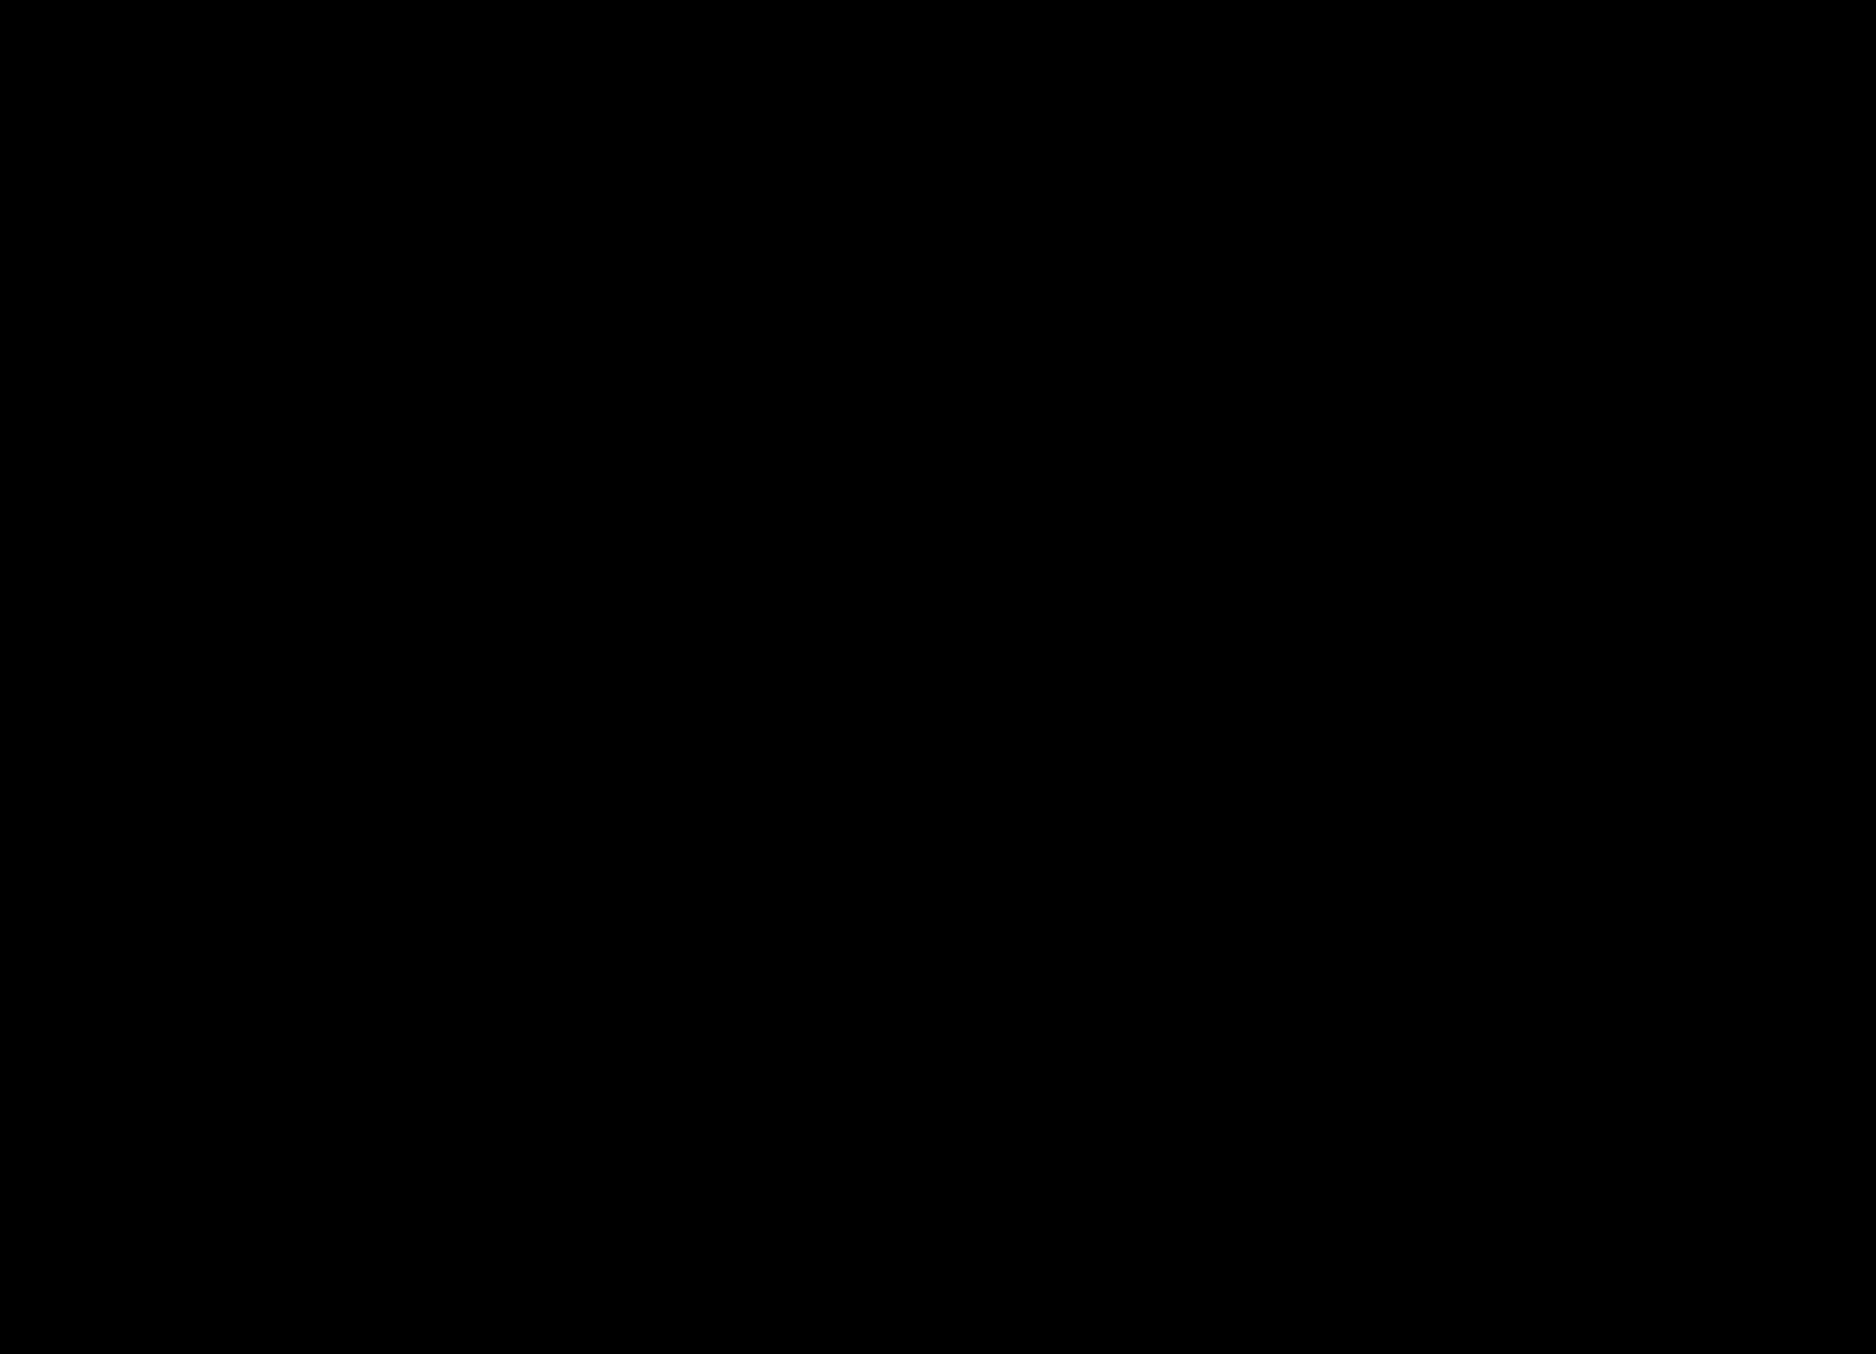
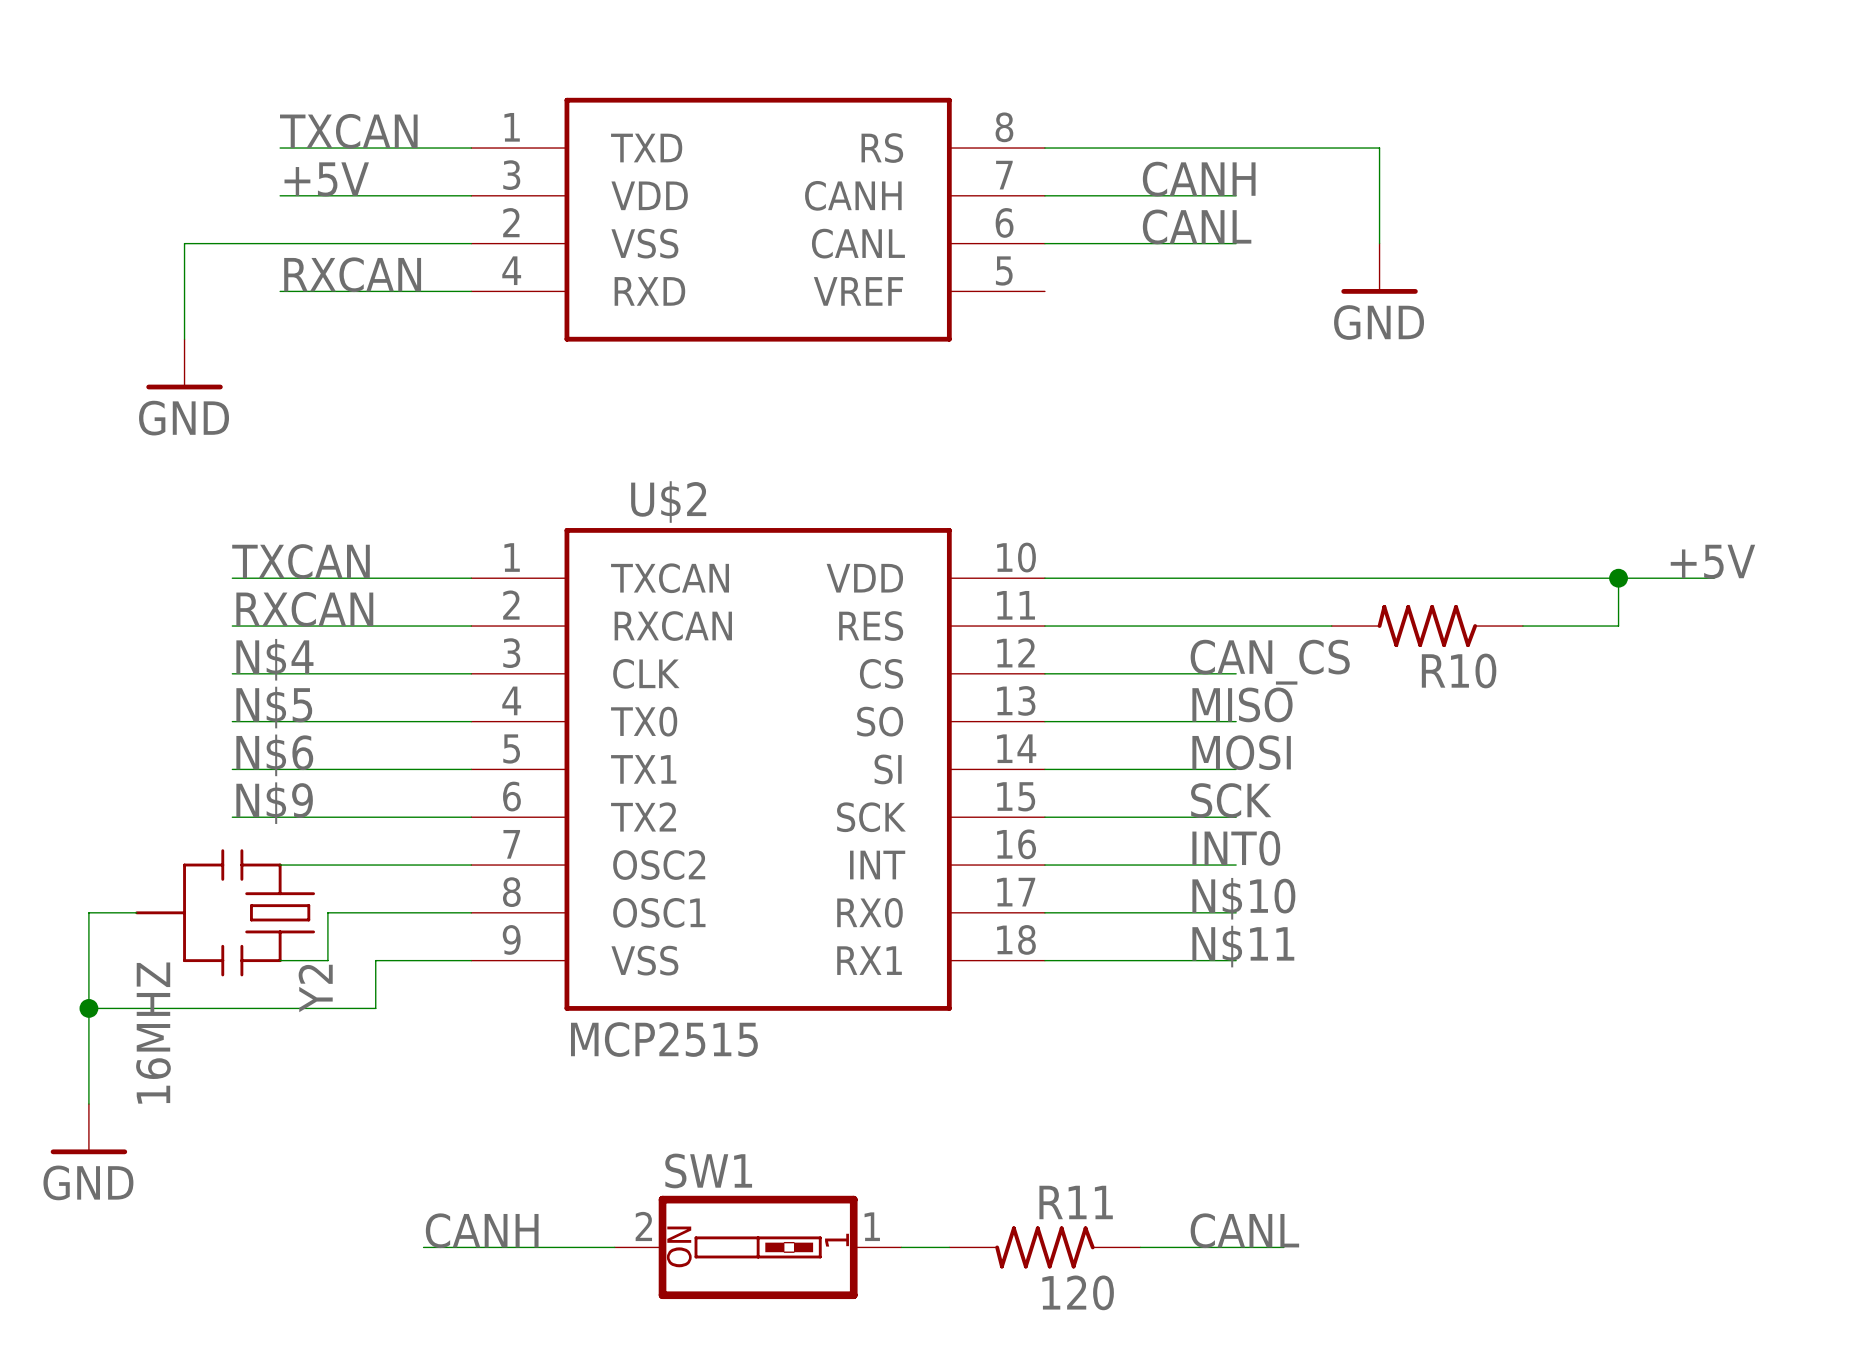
label: none -> TXCAN (348, 131)
wire: none -> (280, 148) (471, 148)
wire: none -> (1044, 148) (1379, 148) (1379, 243)
label: none -> +5V (326, 179)
label: none -> CANH (1199, 179)
wire: none -> (280, 195) (471, 195)
wire: none -> (1044, 195) (1236, 195)
part: none -> (758, 219)
label: none -> CANL (1197, 226)
wire: none -> (471, 243) (184, 243) (184, 339)
wire: none -> (1044, 243) (1236, 243)
power symbol: none -> GND (1379, 268)
label: none -> RXCAN (352, 274)
wire: none -> (280, 291) (471, 291)
power symbol: none -> GND (184, 364)
label: none -> TXCAN (301, 561)
label: none -> +5V (1712, 561)
wire: none -> (232, 578) (471, 578)
wire: none -> (1044, 578) (1714, 578)
wire: none -> (1618, 578) (1618, 626) (1522, 626)
junction: none -> (1618, 578)
label: none -> RXCAN (304, 609)
wire: none -> (232, 626) (471, 626)
wire: none -> (1044, 626) (1331, 626)
R10: none -> (1427, 626)
label: none -> N$4 (274, 659)
label: none -> CAN_CS (1270, 662)
wire: none -> (232, 673) (471, 673)
wire: none -> (1044, 673) (1236, 673)
label: none -> N$5 (274, 707)
label: none -> MISO (1242, 704)
wire: none -> (232, 721) (471, 721)
wire: none -> (1044, 721) (1236, 721)
label: none -> N$6 (274, 755)
label: none -> MOSI (1241, 752)
wire: none -> (232, 769) (471, 769)
U$2: none -> MCP2515 (758, 769)
wire: none -> (1044, 769) (1236, 769)
label: none -> N$9 (274, 803)
label: none -> SCK (1231, 800)
wire: none -> (232, 817) (471, 817)
wire: none -> (1044, 817) (1236, 817)
label: none -> INT0 (1236, 848)
wire: none -> (280, 865) (471, 865)
wire: none -> (1044, 865) (1236, 865)
label: none -> N$10 (1243, 898)
wire: none -> (136, 912) (88, 912) (88, 1104)
Y2: none -> 16MHZ (225, 912)
wire: none -> (471, 912) (327, 912) (327, 960) (280, 960)
wire: none -> (1044, 912) (1236, 912)
label: none -> N$11 (1243, 946)
wire: none -> (471, 960) (375, 960) (375, 1008) (88, 1008)
wire: none -> (1044, 960) (1236, 960)
junction: none -> (88, 1008)
power symbol: none -> GND (88, 1129)
label: none -> CANH (482, 1230)
label: none -> CANL (1244, 1230)
wire: none -> (423, 1247) (614, 1247)
SW1: none -> (758, 1247)
wire: none -> (901, 1247) (949, 1247)
R11: none -> 120 (1044, 1247)
wire: none -> (1140, 1247) (1283, 1247)

